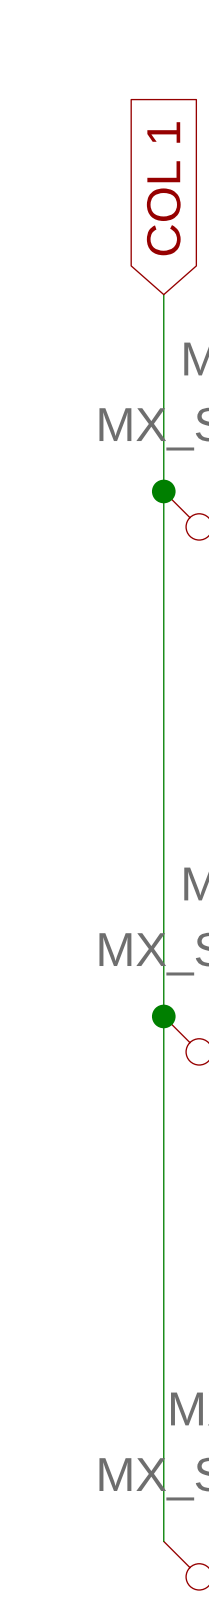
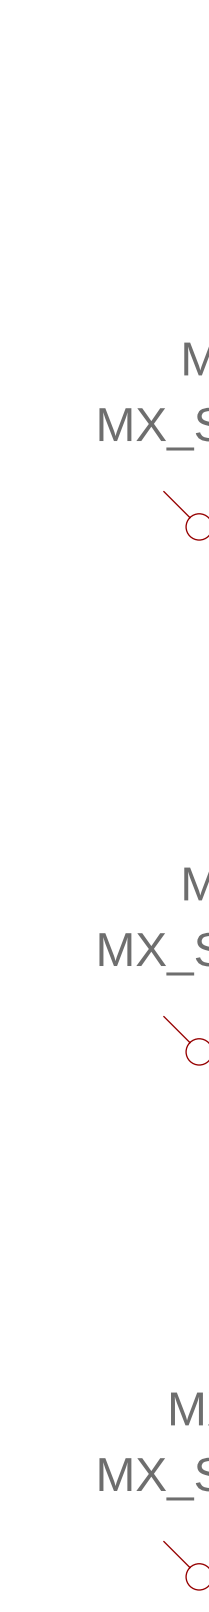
global label: COL 1 (163, 188) -> none
wire: (163, 294) (163, 1541) -> none
junction: (163, 491) -> none
junction: (163, 1016) -> none

